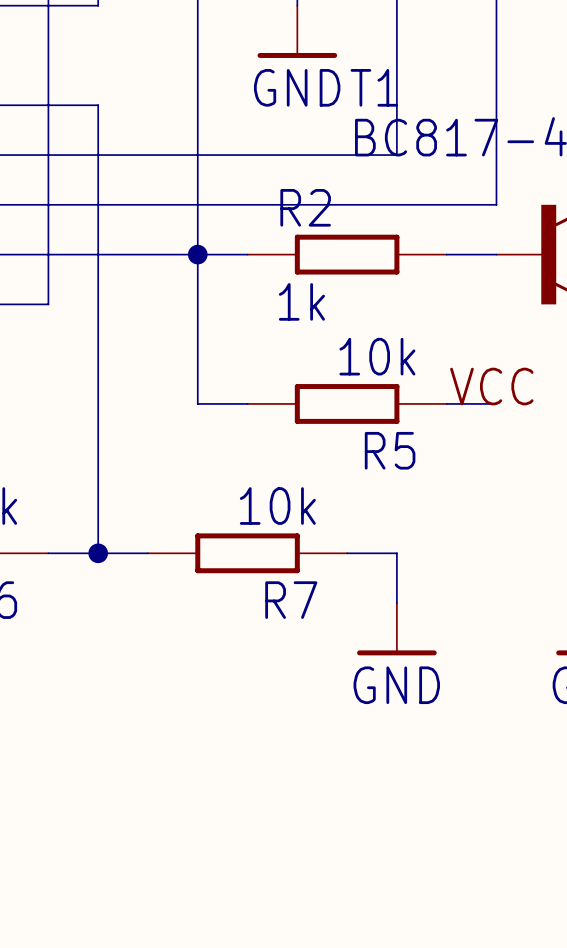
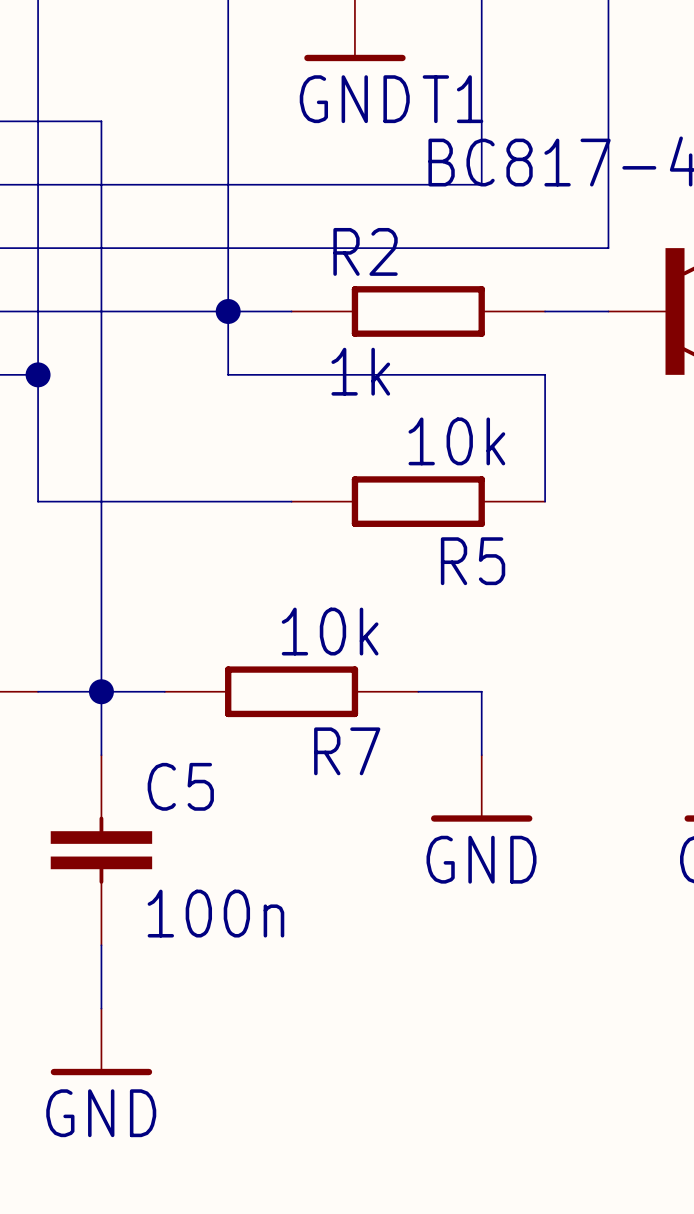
junction: none -> (38, 374)
wire: (197, 304) (197, 403) -> (38, 374) (38, 501) (228, 501)
label: VCC (491, 386) -> none
wire: (446, 403) (496, 403) -> (545, 501) (545, 374) (228, 374)
wire: none -> (101, 691) (101, 755)
C5: none -> 100n (101, 850)
wire: none -> (101, 945) (101, 1008)
power symbol: none -> GND (101, 1041)

